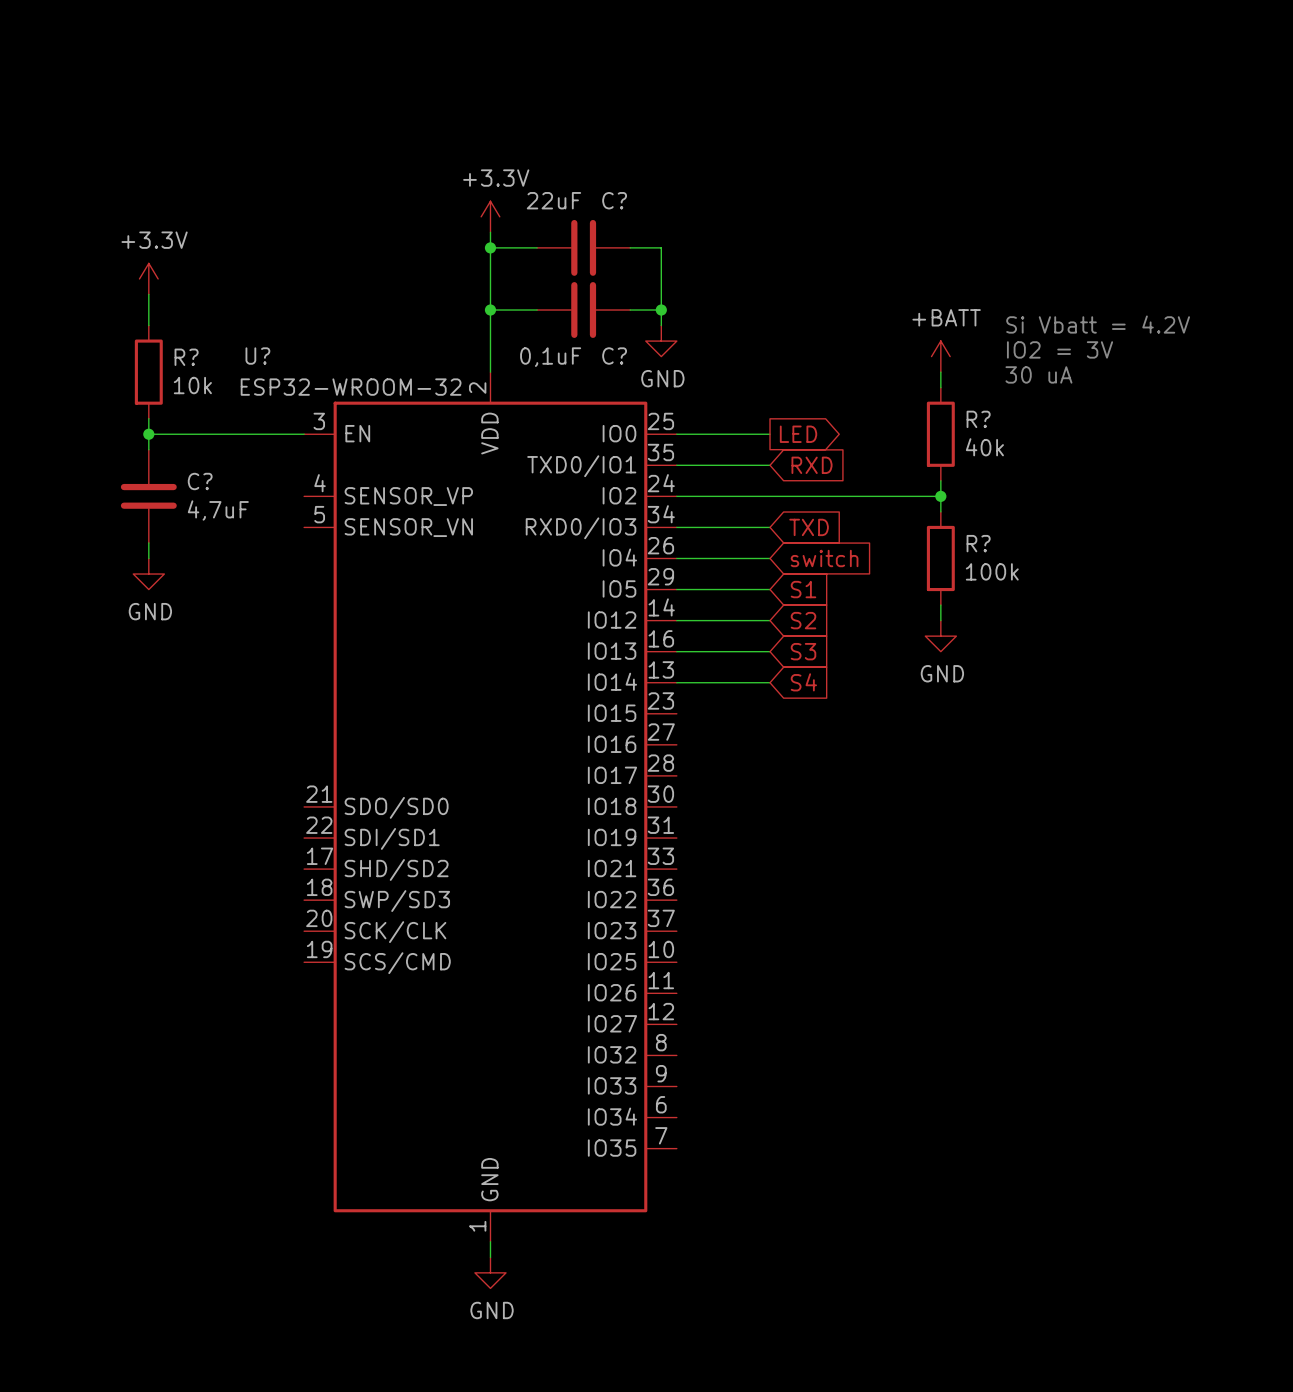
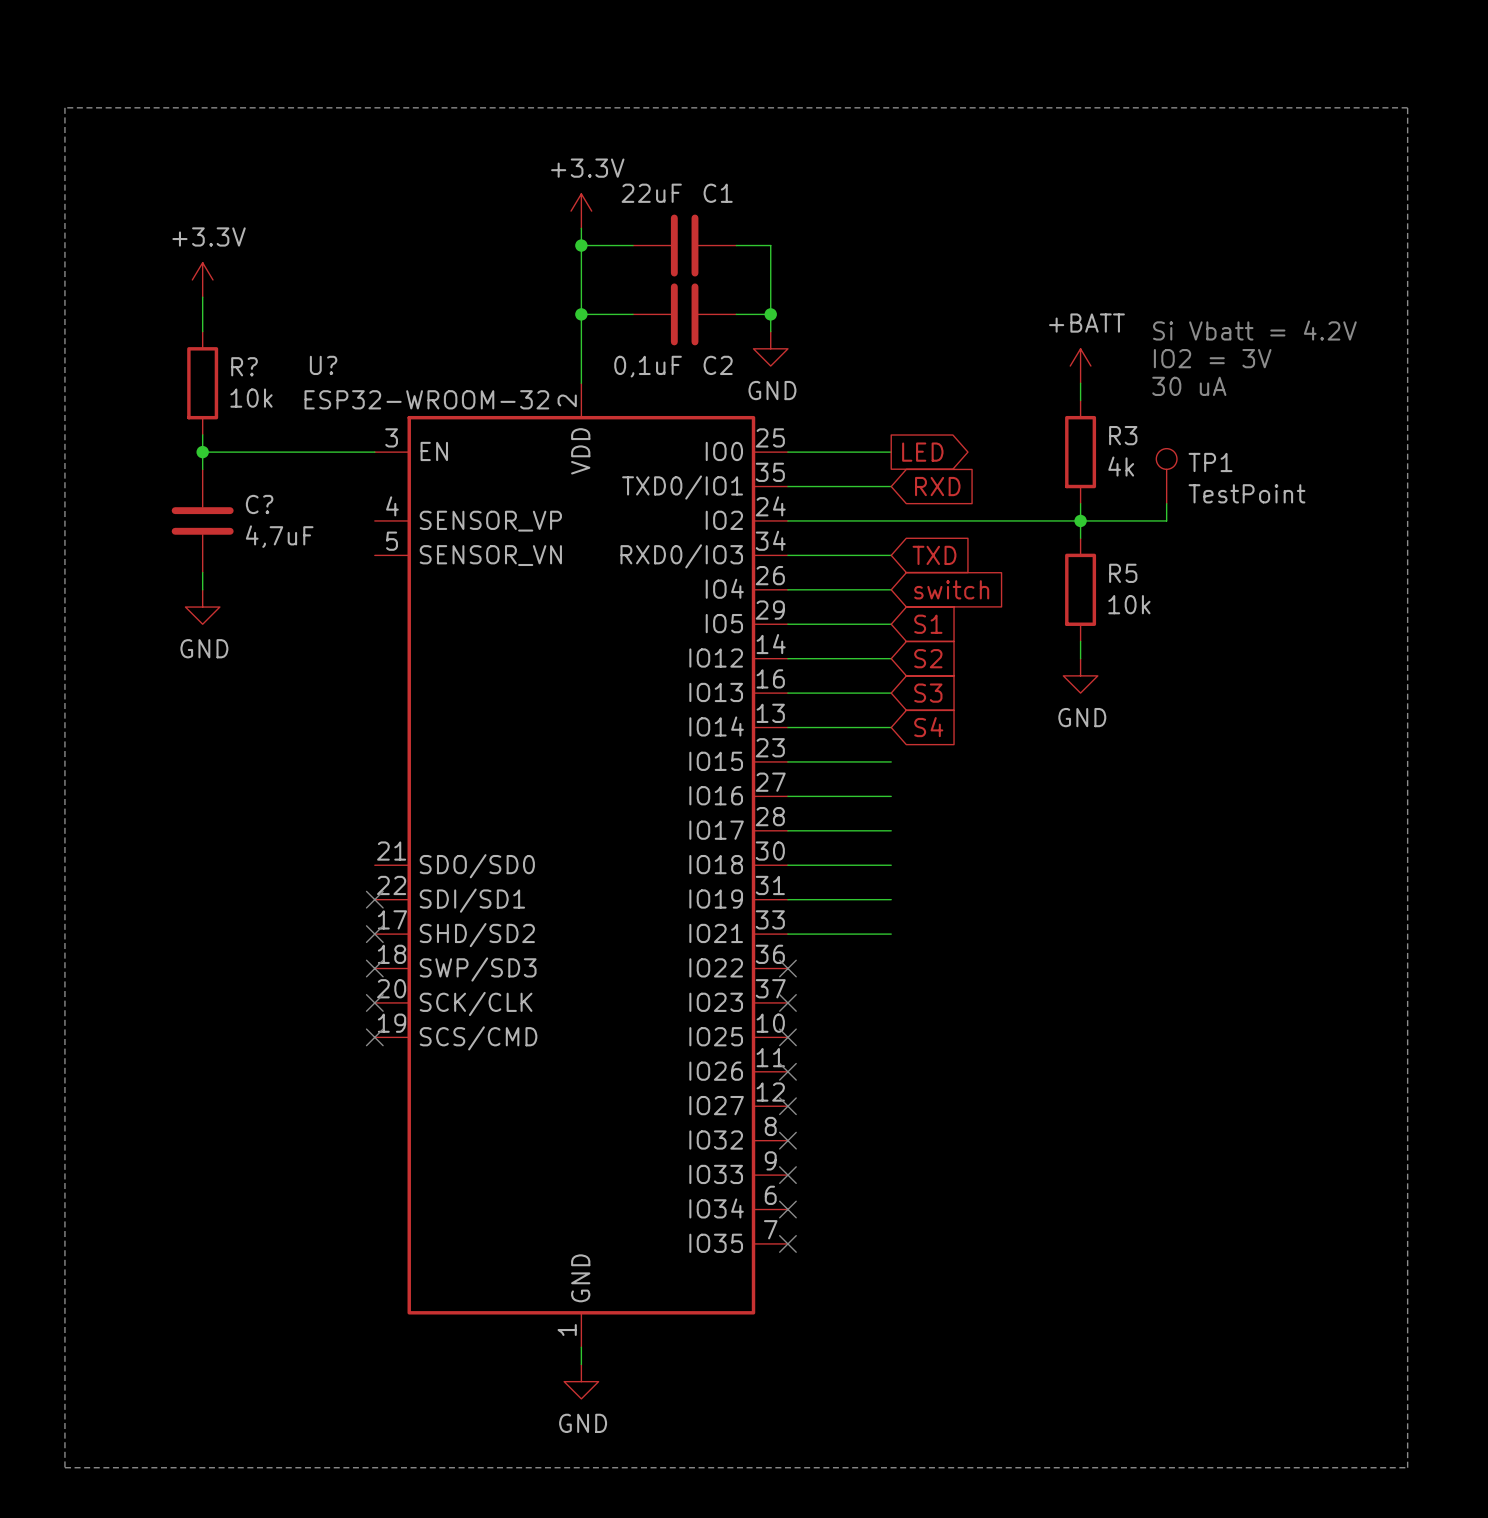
line: none -> (64, 107) (1407, 107) (1407, 1467) (64, 1467) (64, 107)
C? name: C? (614, 200) -> C1 (718, 193)
C? name: C? (614, 356) -> C2 (718, 365)
R? name: R? (978, 419) -> R3 (1123, 435)
R? value: 40k (984, 447) -> 4k (1121, 466)
TP1: none -> TestPoint (1166, 476)
wire: none -> (1166, 503) (1166, 520) (1080, 520)
R? name: R? (978, 543) -> R5 (1123, 573)
R? value: 100k (992, 571) -> 10k (1129, 604)
wire: none -> (787, 761) (891, 761)
wire: none -> (787, 796) (891, 796)
wire: none -> (787, 830) (891, 830)
wire: none -> (787, 865) (891, 865)
no-connect mark: none -> (374, 899)
wire: none -> (787, 899) (891, 899)
no-connect mark: none -> (374, 934)
wire: none -> (787, 934) (891, 934)
no-connect mark: none -> (374, 968)
no-connect mark: none -> (787, 968)
no-connect mark: none -> (374, 1002)
no-connect mark: none -> (787, 1002)
no-connect mark: none -> (374, 1037)
no-connect mark: none -> (787, 1037)
no-connect mark: none -> (787, 1071)
no-connect mark: none -> (787, 1106)
no-connect mark: none -> (787, 1140)
no-connect mark: none -> (787, 1175)
no-connect mark: none -> (787, 1209)
no-connect mark: none -> (787, 1243)

